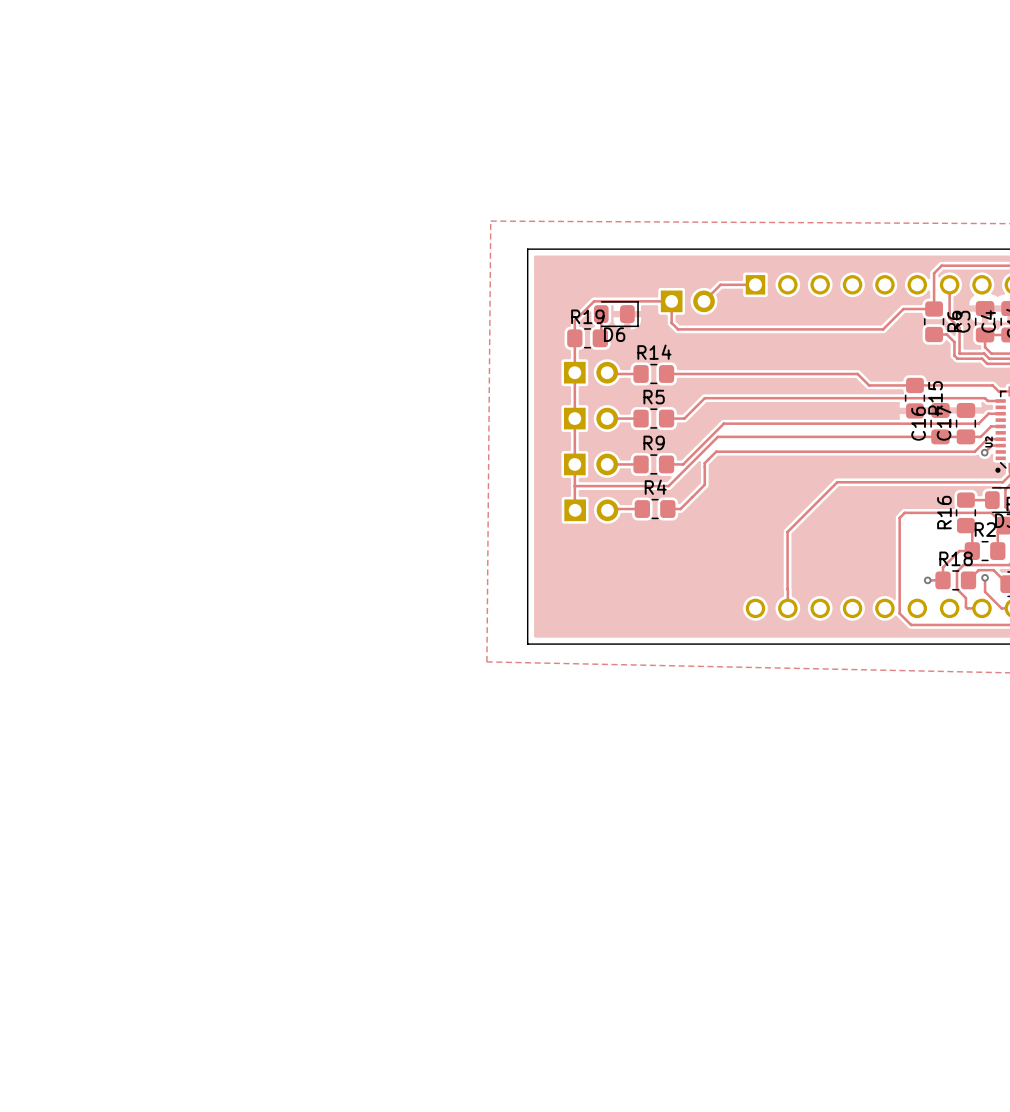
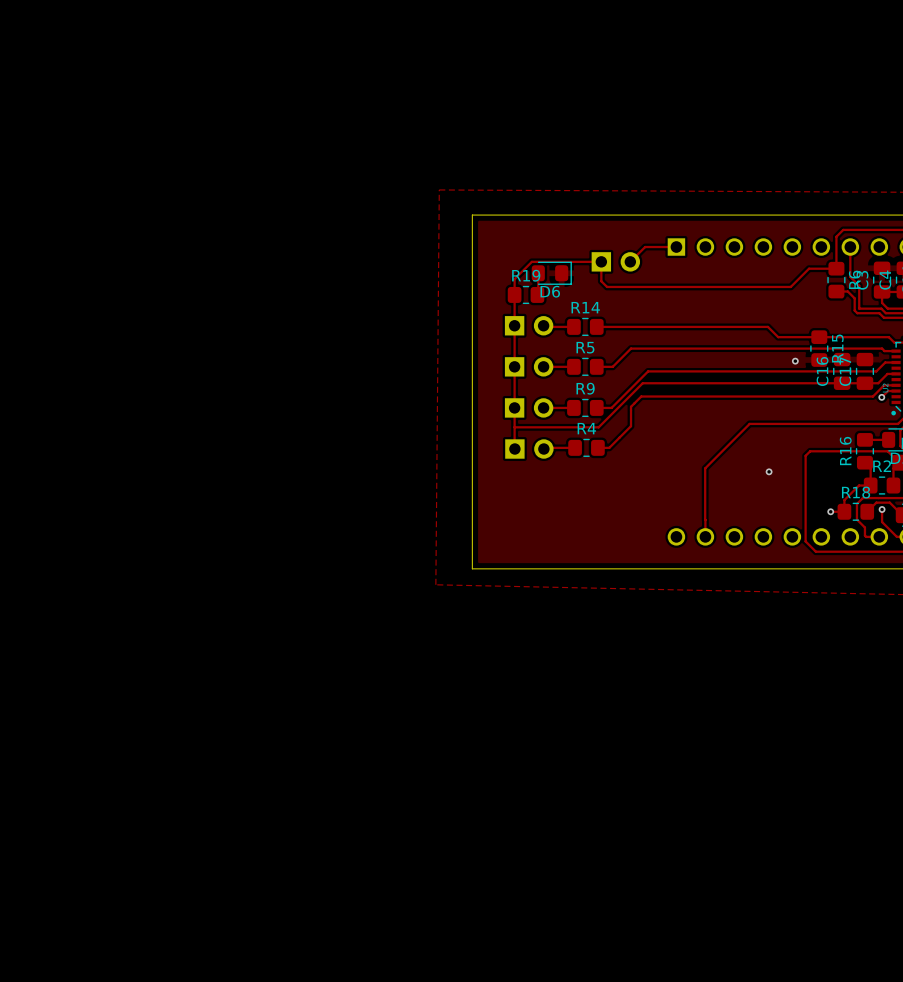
via: none -> (795, 361)
via: none -> (769, 471)

